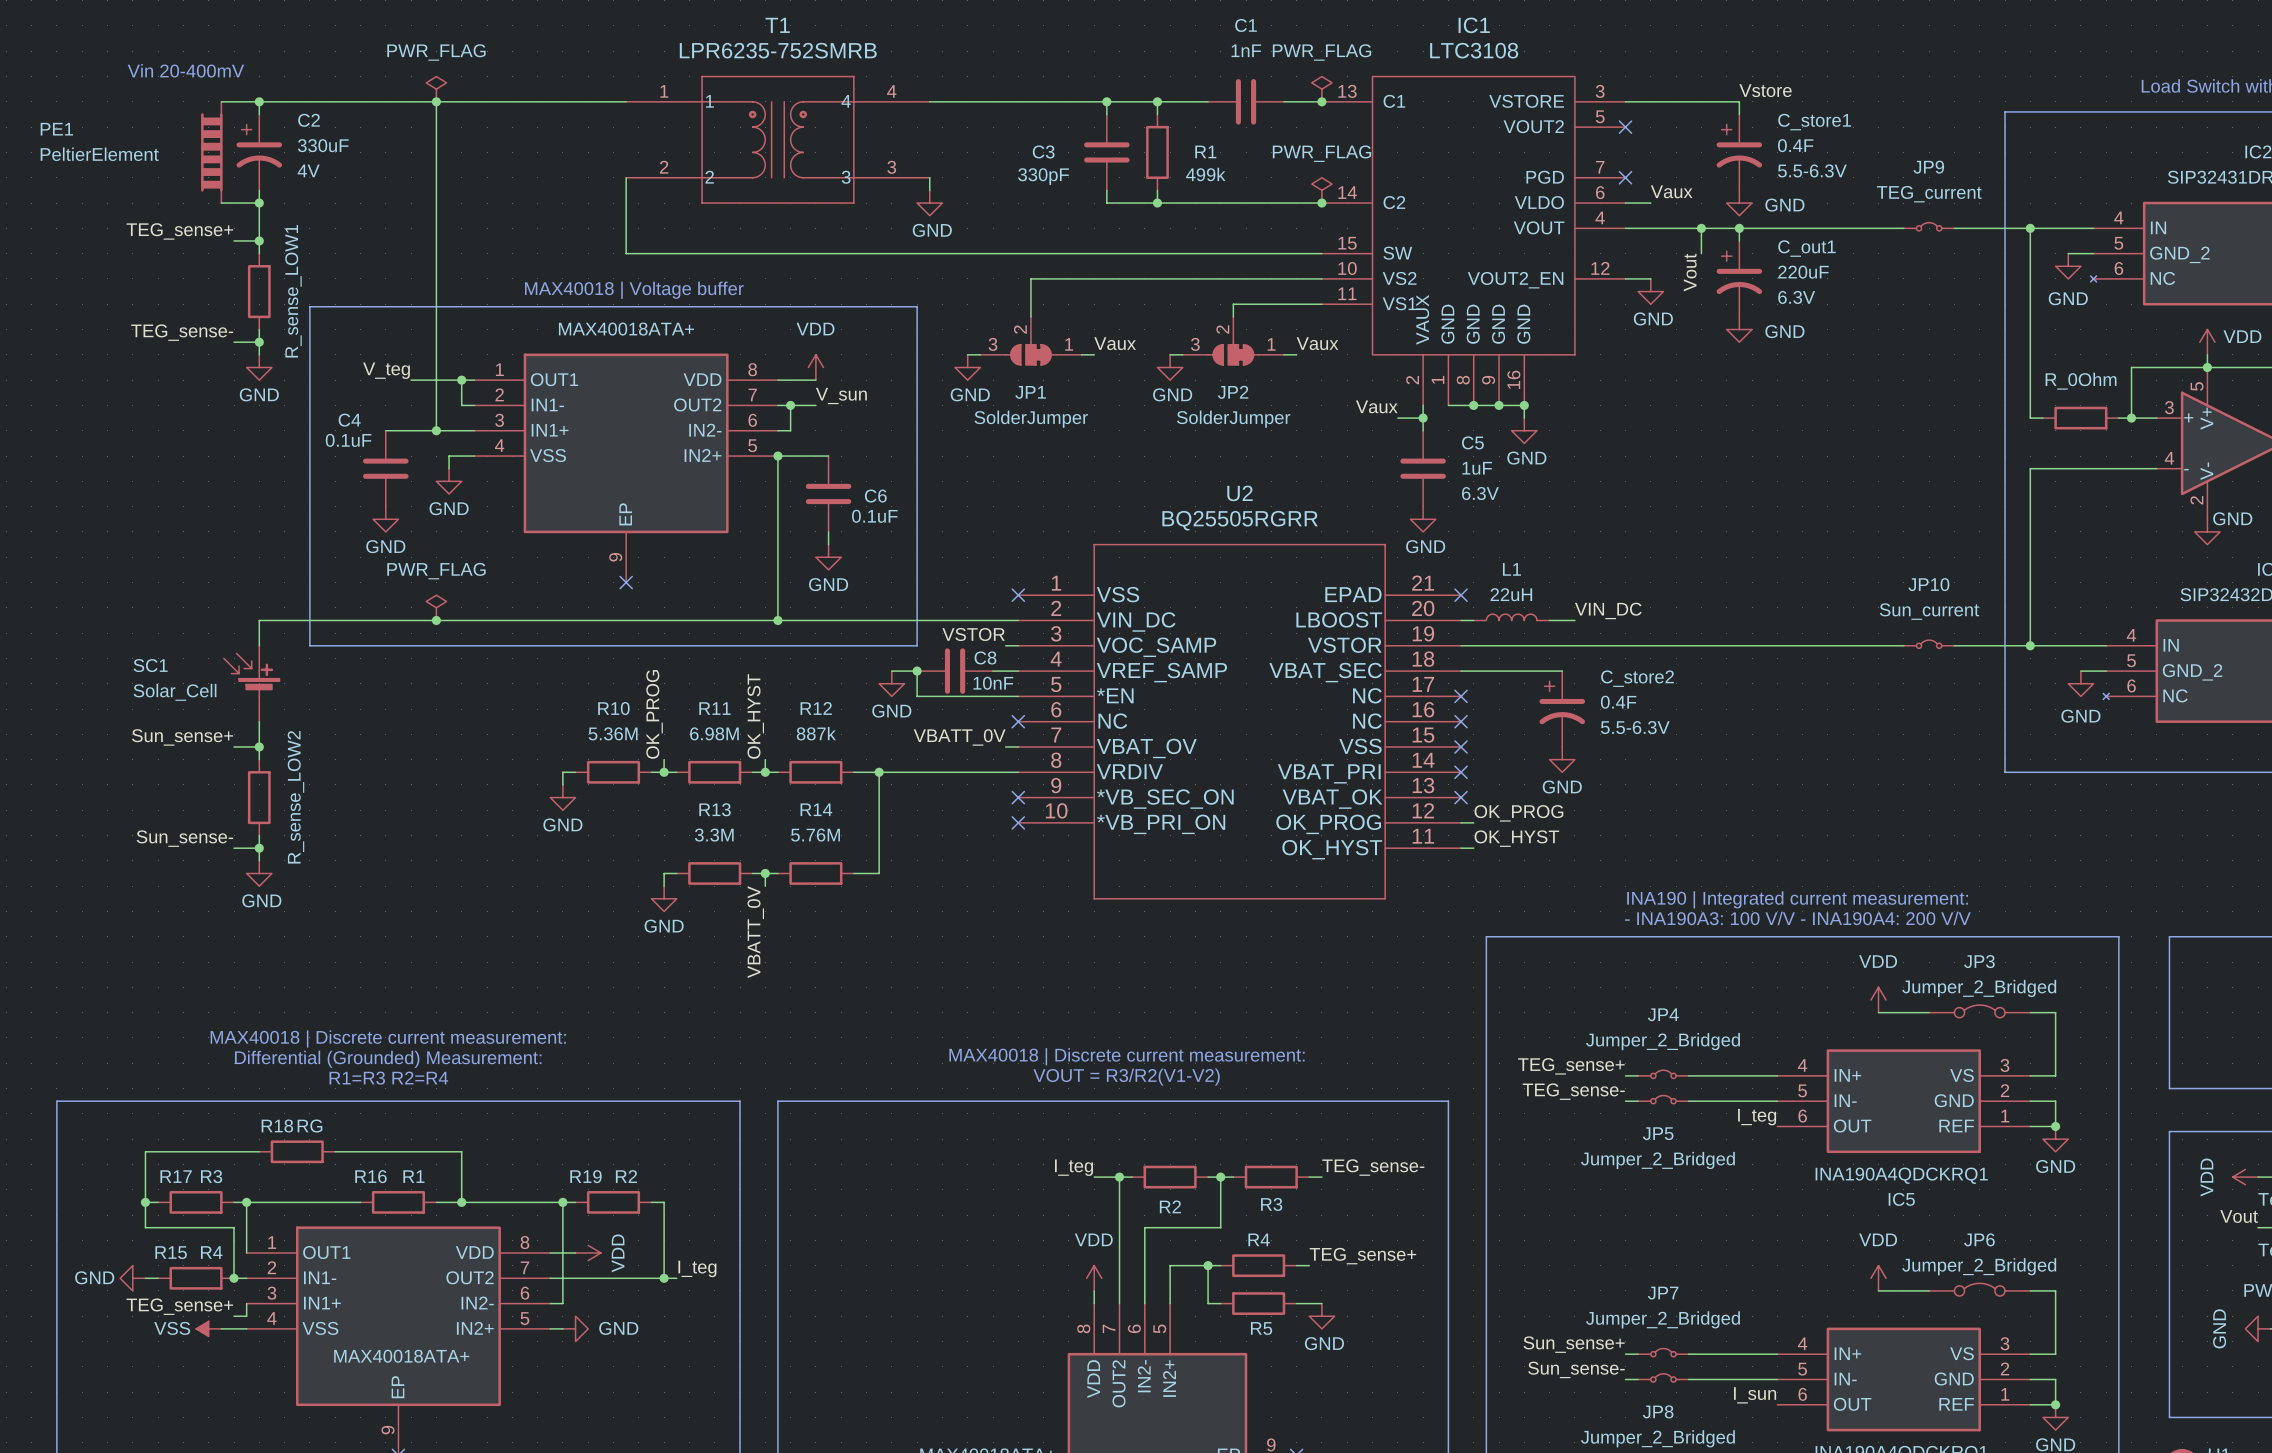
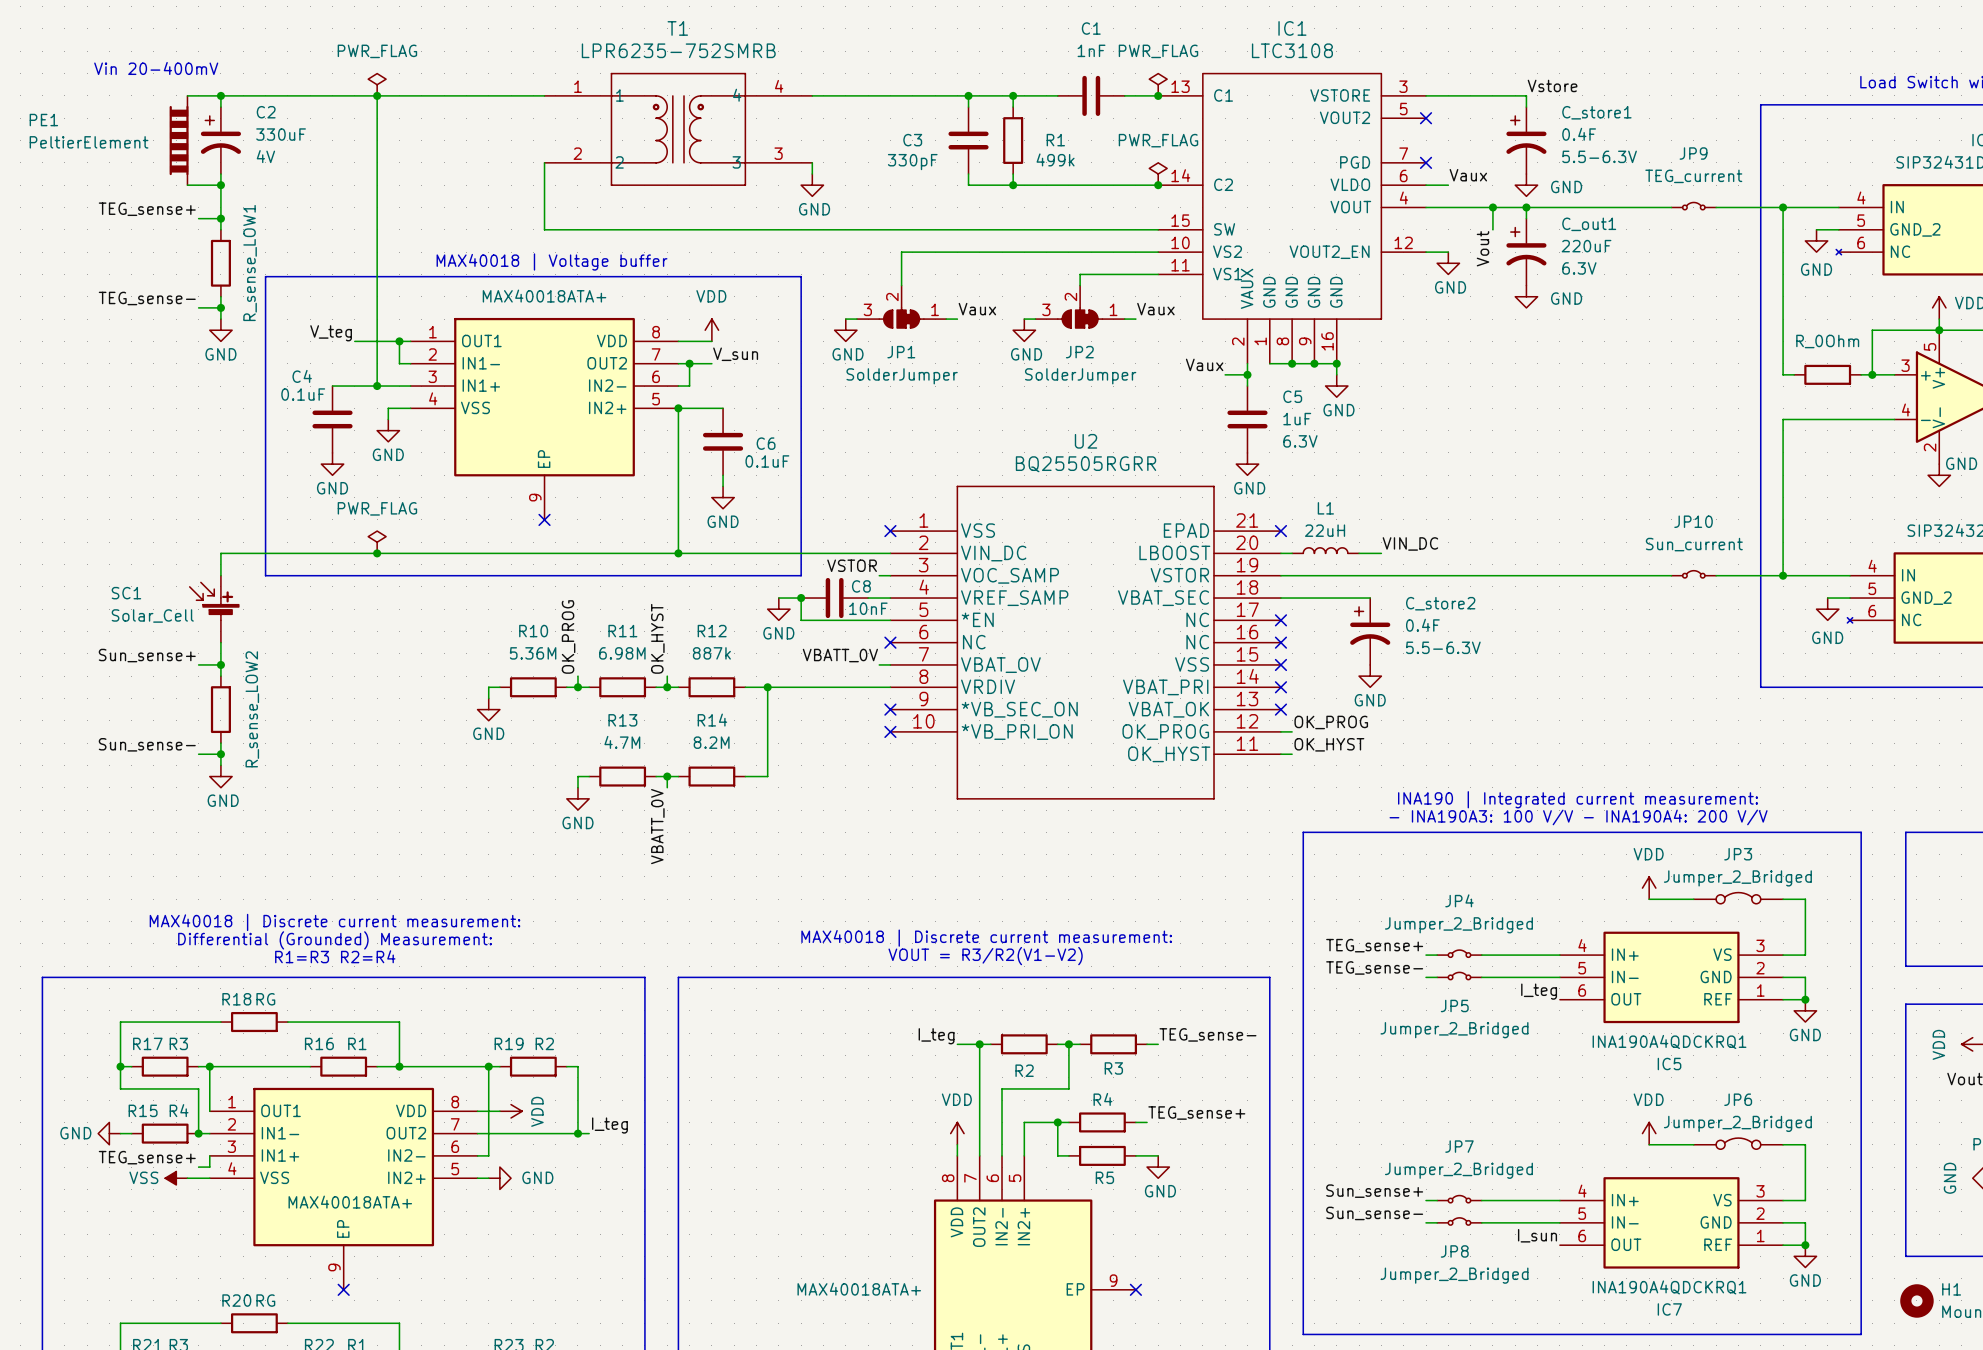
R13 value: 3.3M (714, 835) -> 4.7M (622, 742)
R14 value: 5.76M (815, 835) -> 8.2M (711, 742)

